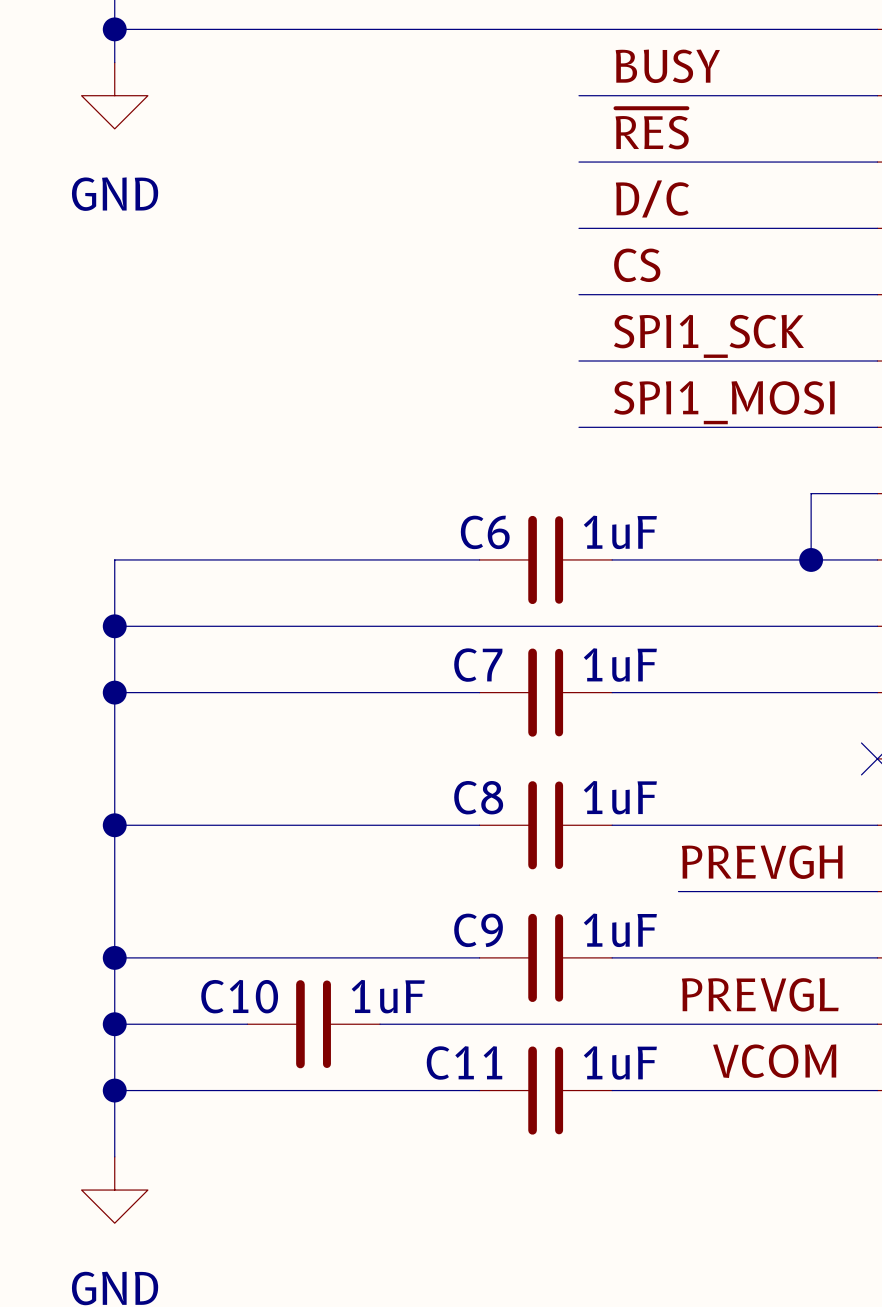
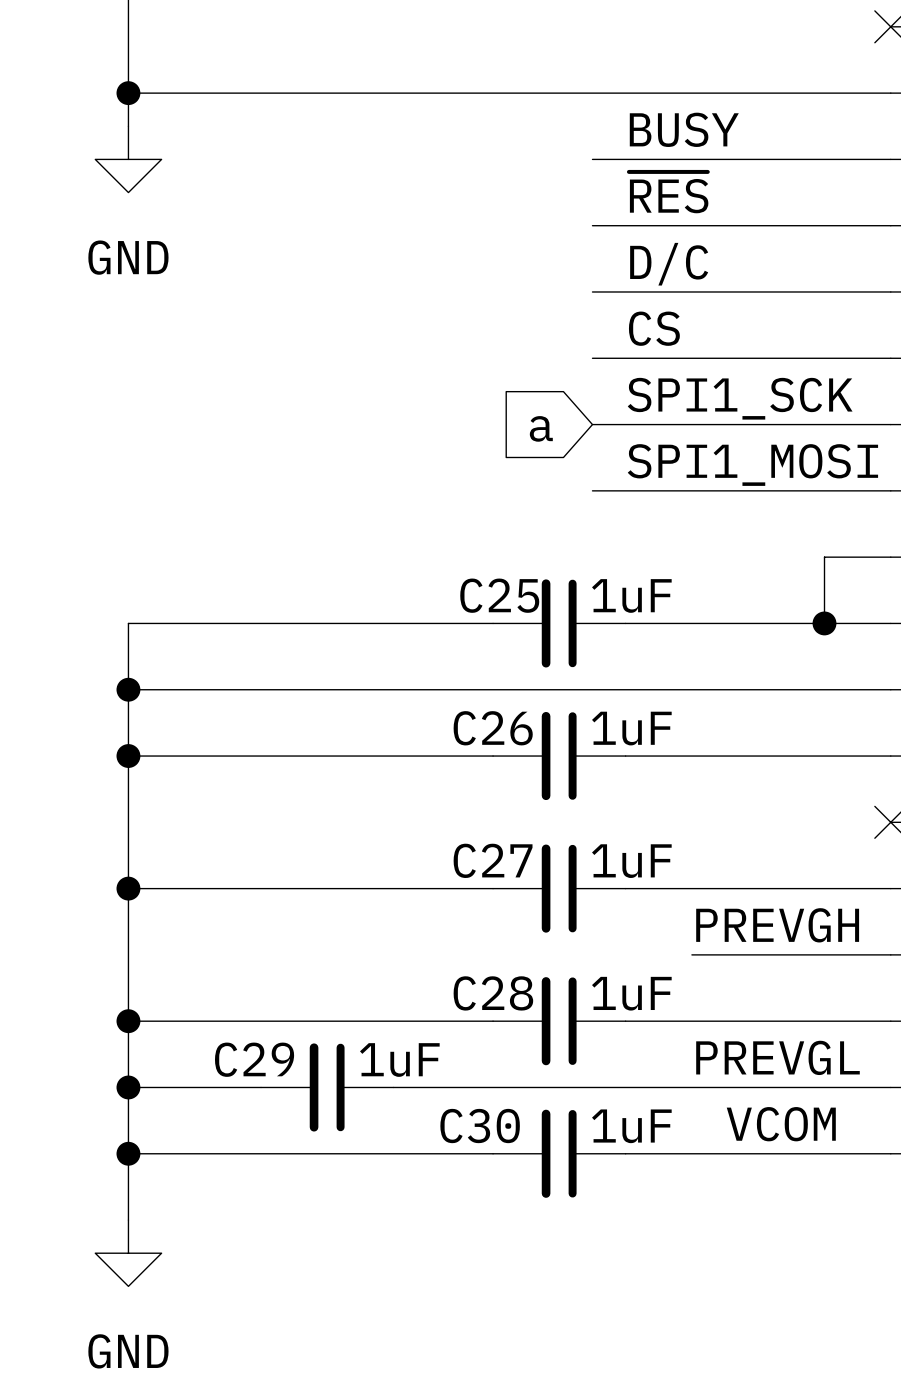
global label: none -> a (541, 428)
C6 name: C6 (485, 532) -> C25 (499, 595)
C7 name: C7 (478, 665) -> C26 (493, 728)
C8 name: C8 (478, 797) -> C27 (493, 860)
C9 name: C9 (478, 930) -> C28 (493, 993)
C10 name: C10 (239, 996) -> C29 (254, 1059)
C11 name: C11 (464, 1062) -> C30 (480, 1126)

